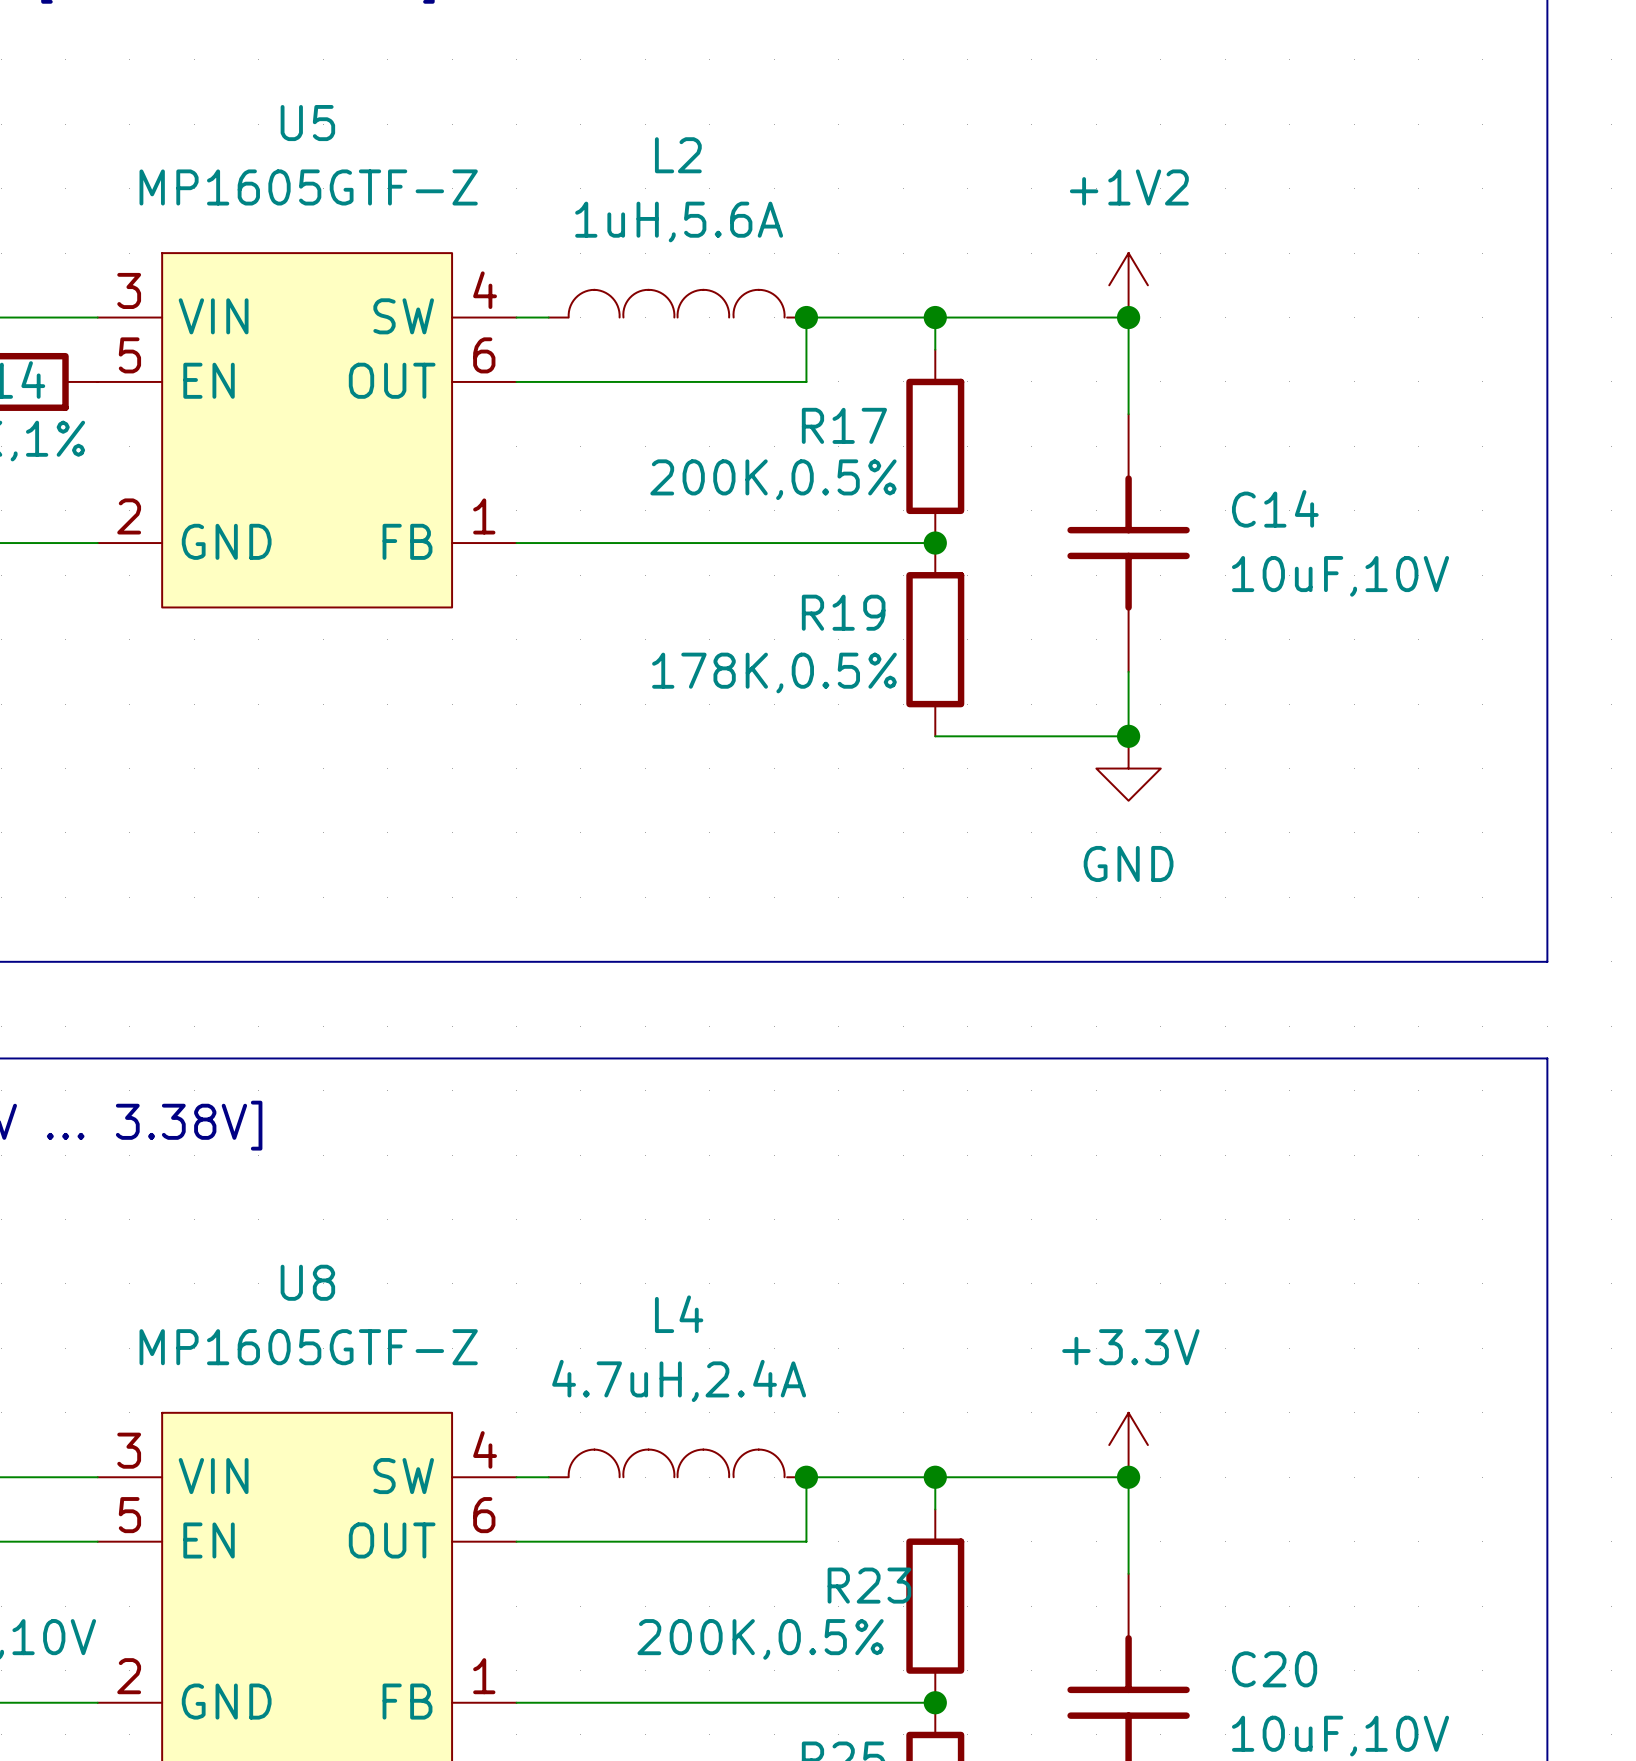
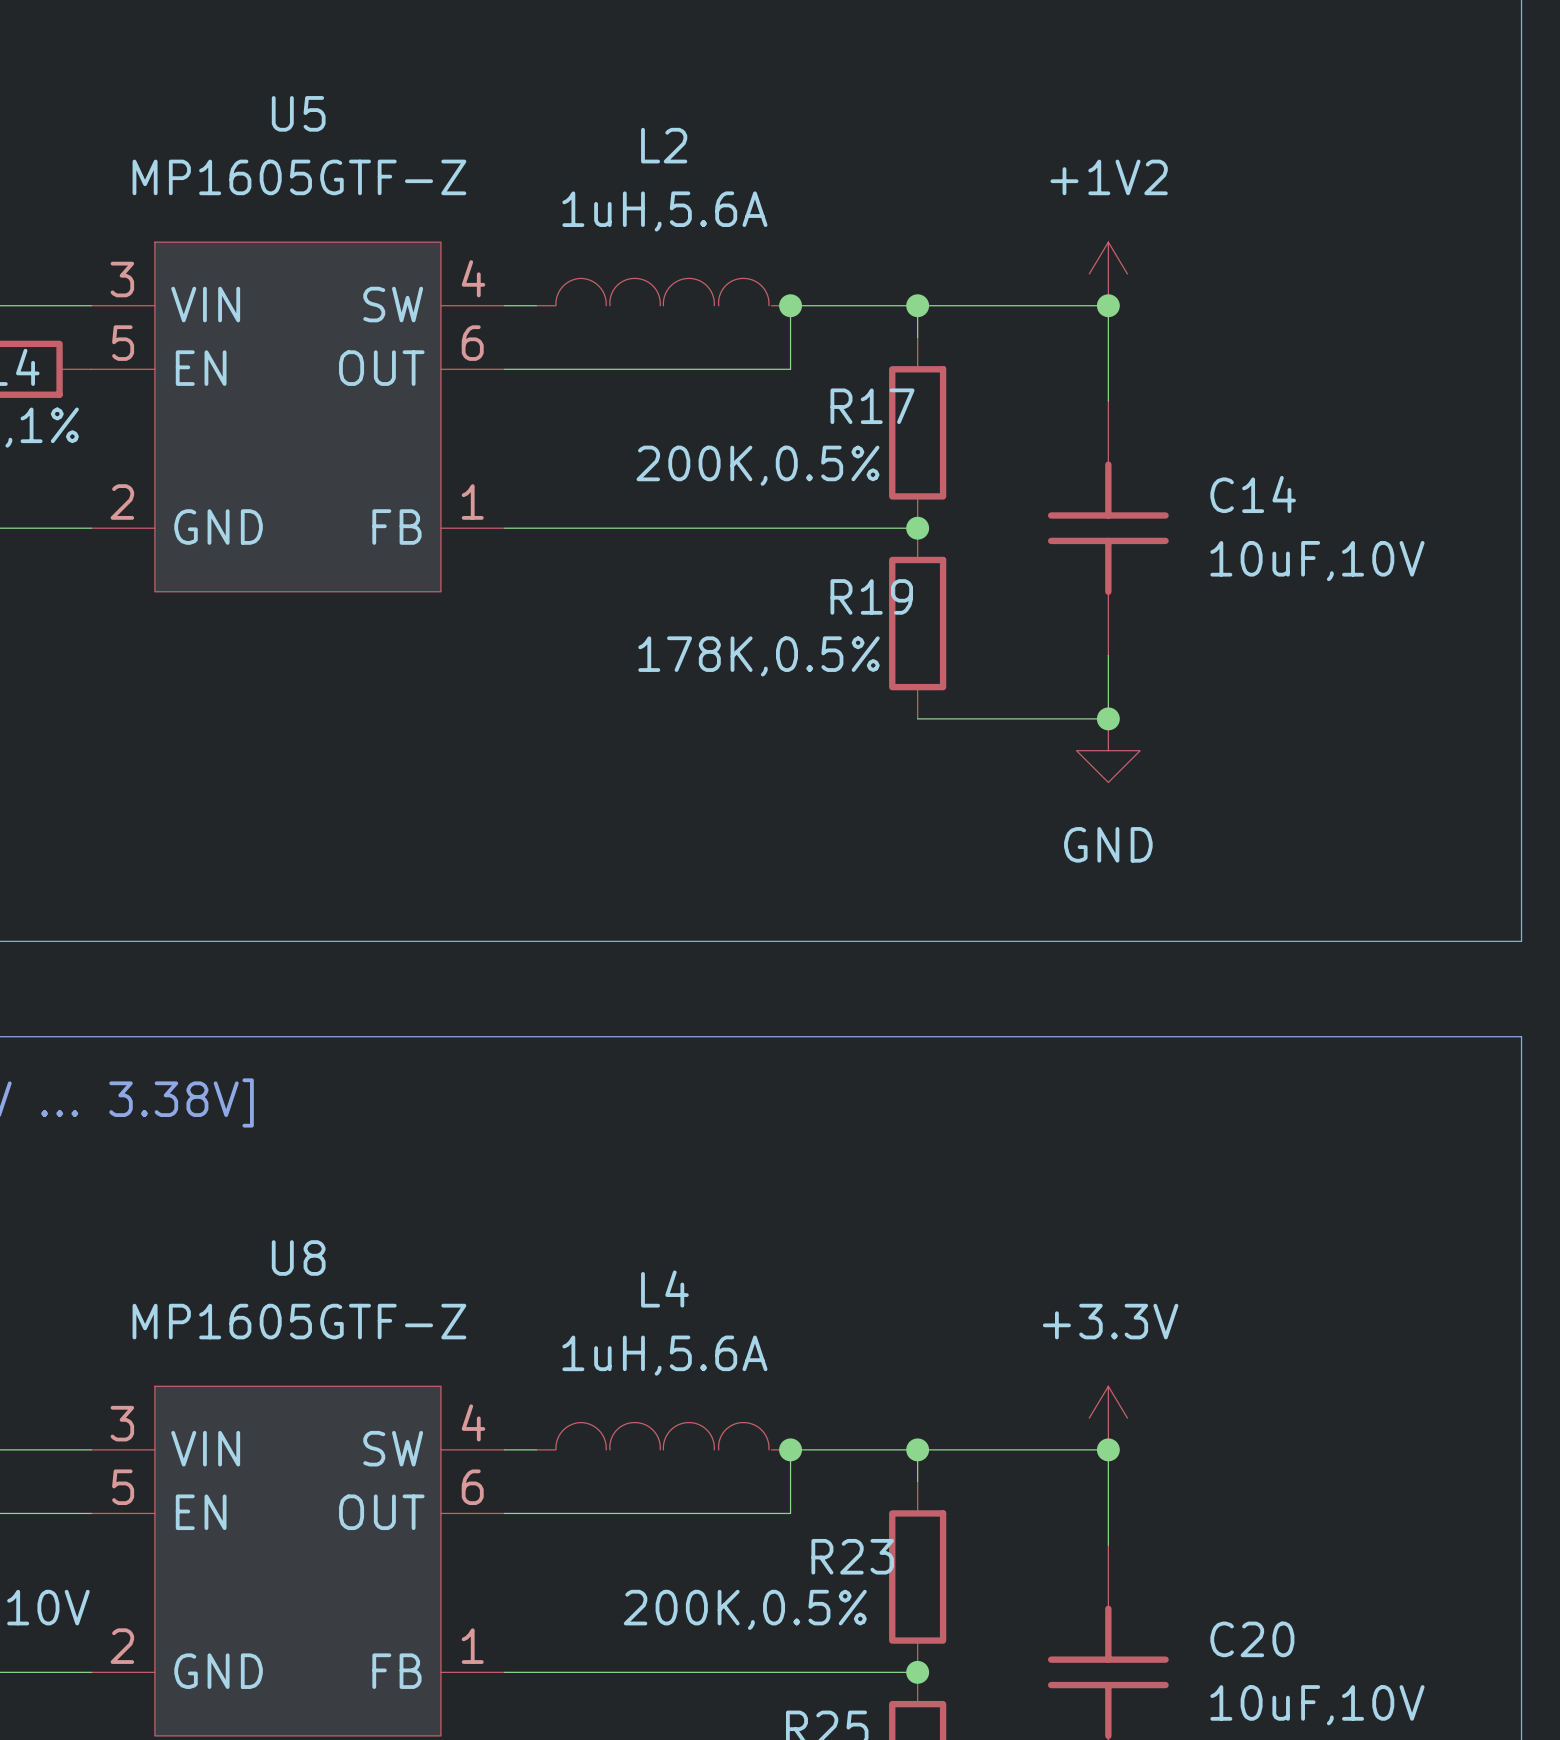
R17 name position: R17 (844, 425) -> R17 (872, 406)
R19 name position: R19 (843, 612) -> R19 (871, 596)
L4 value: 4.7uH,2.4A (679, 1380) -> 1uH,5.6A (664, 1355)

